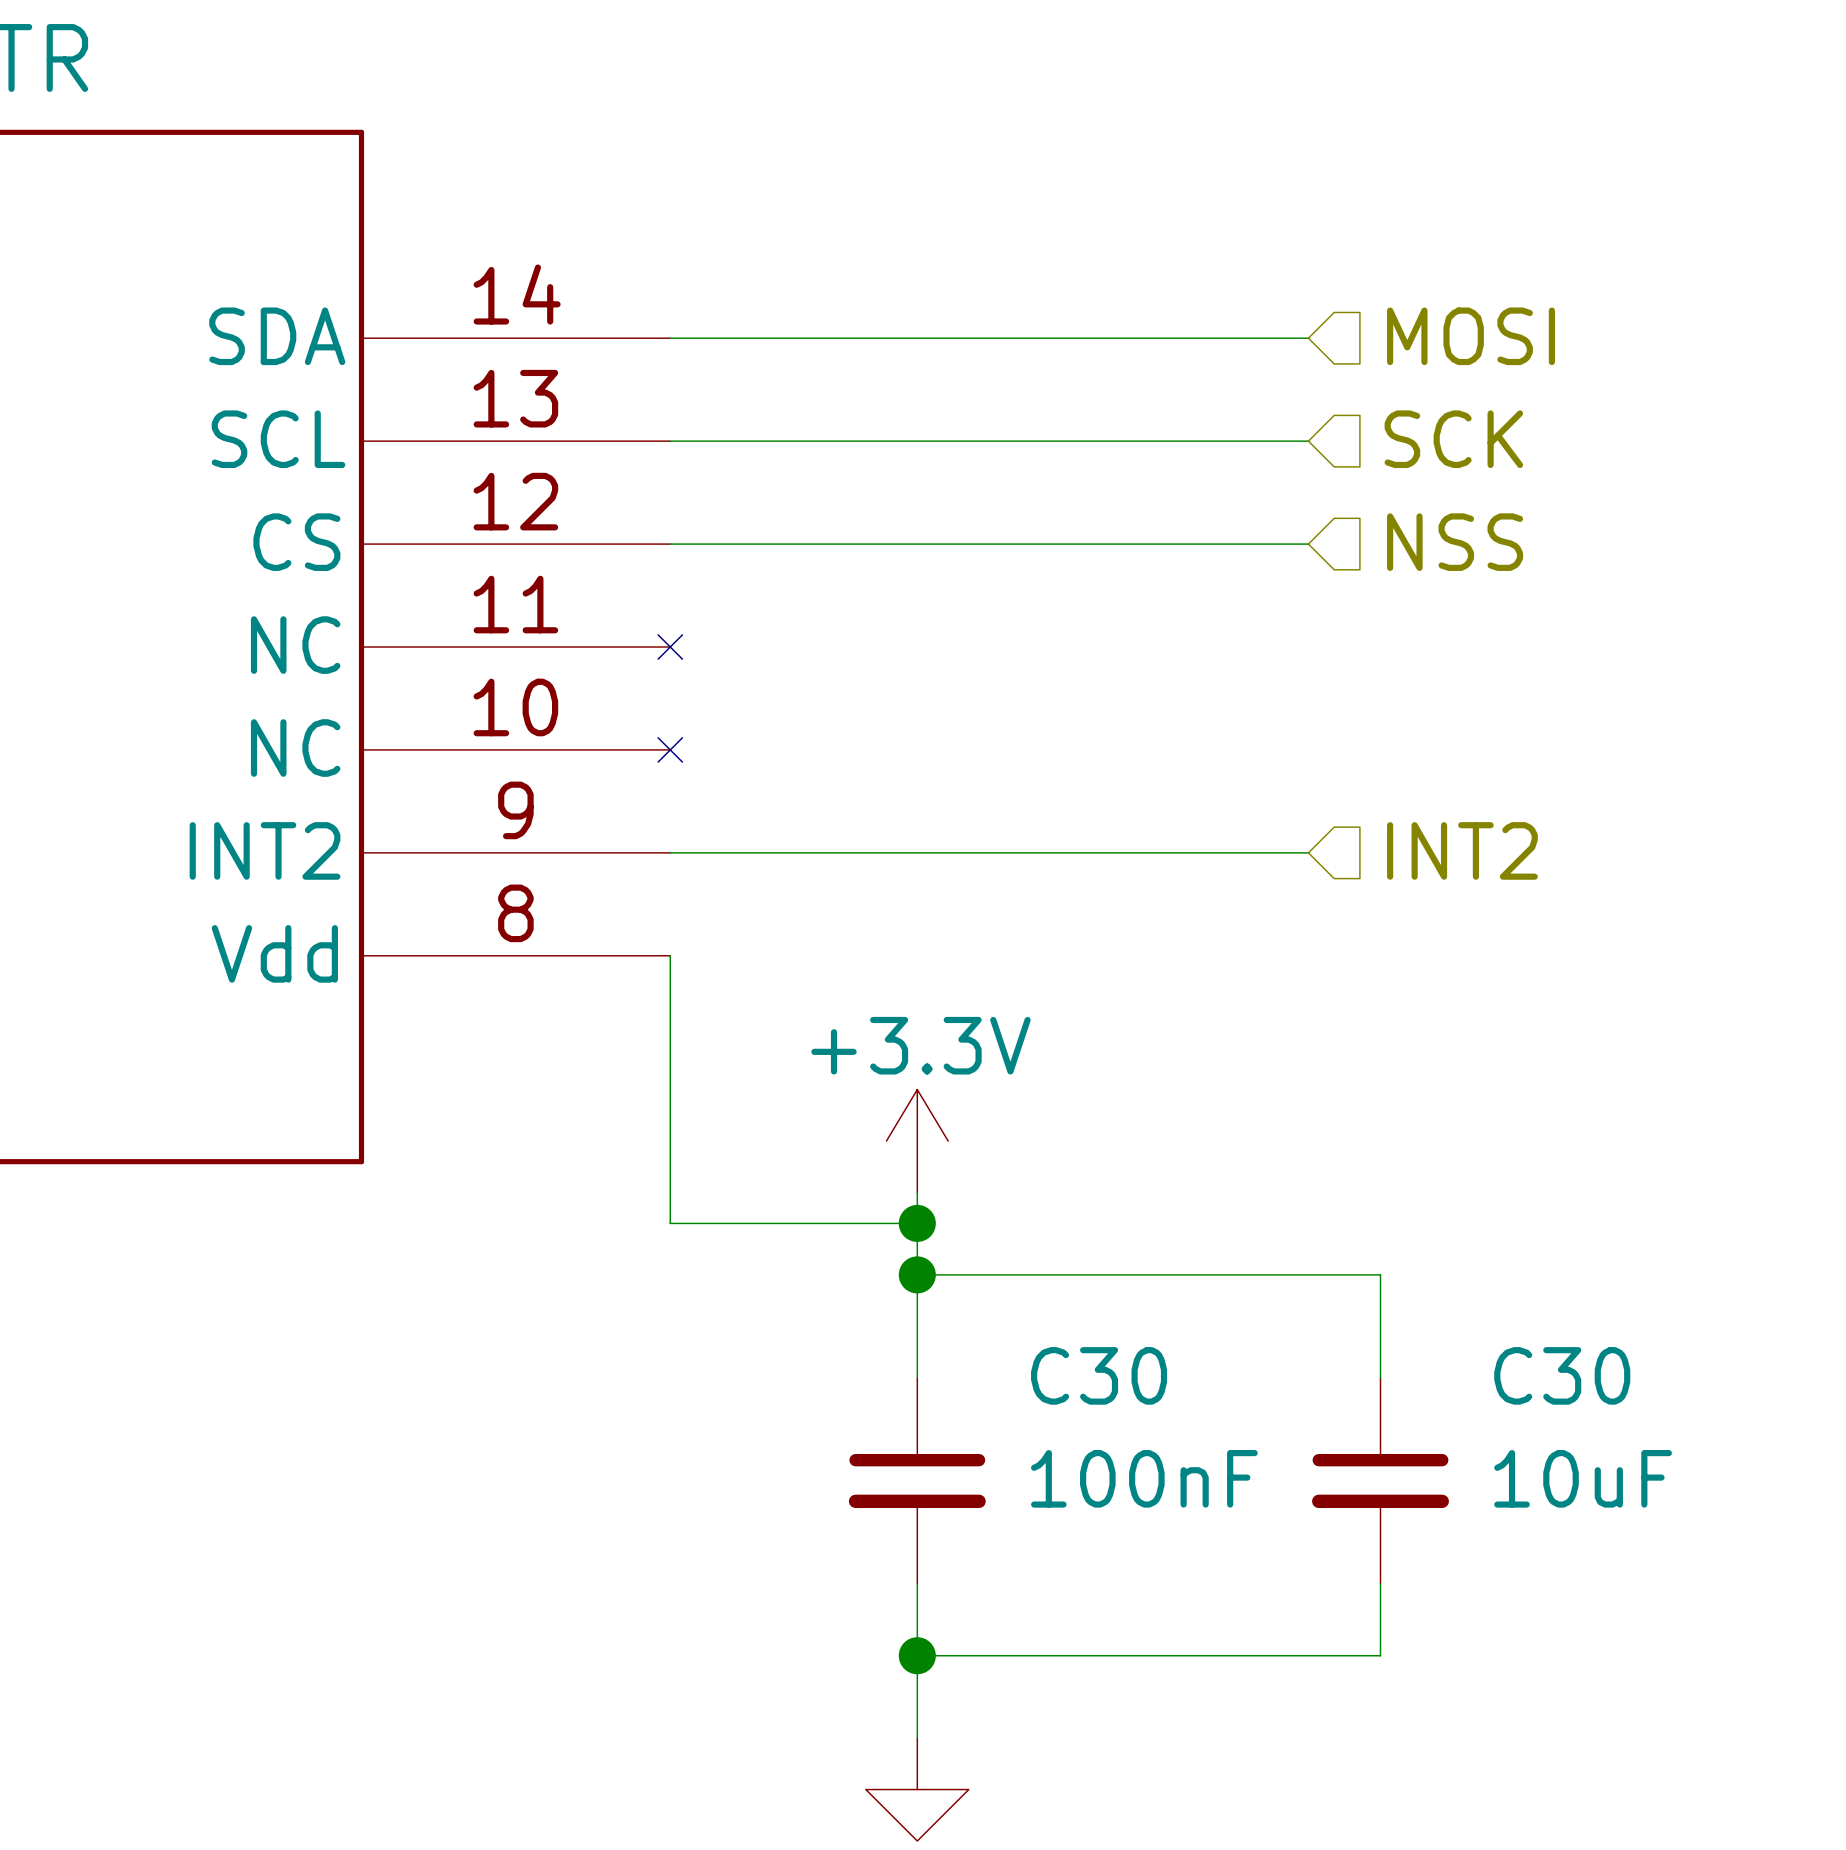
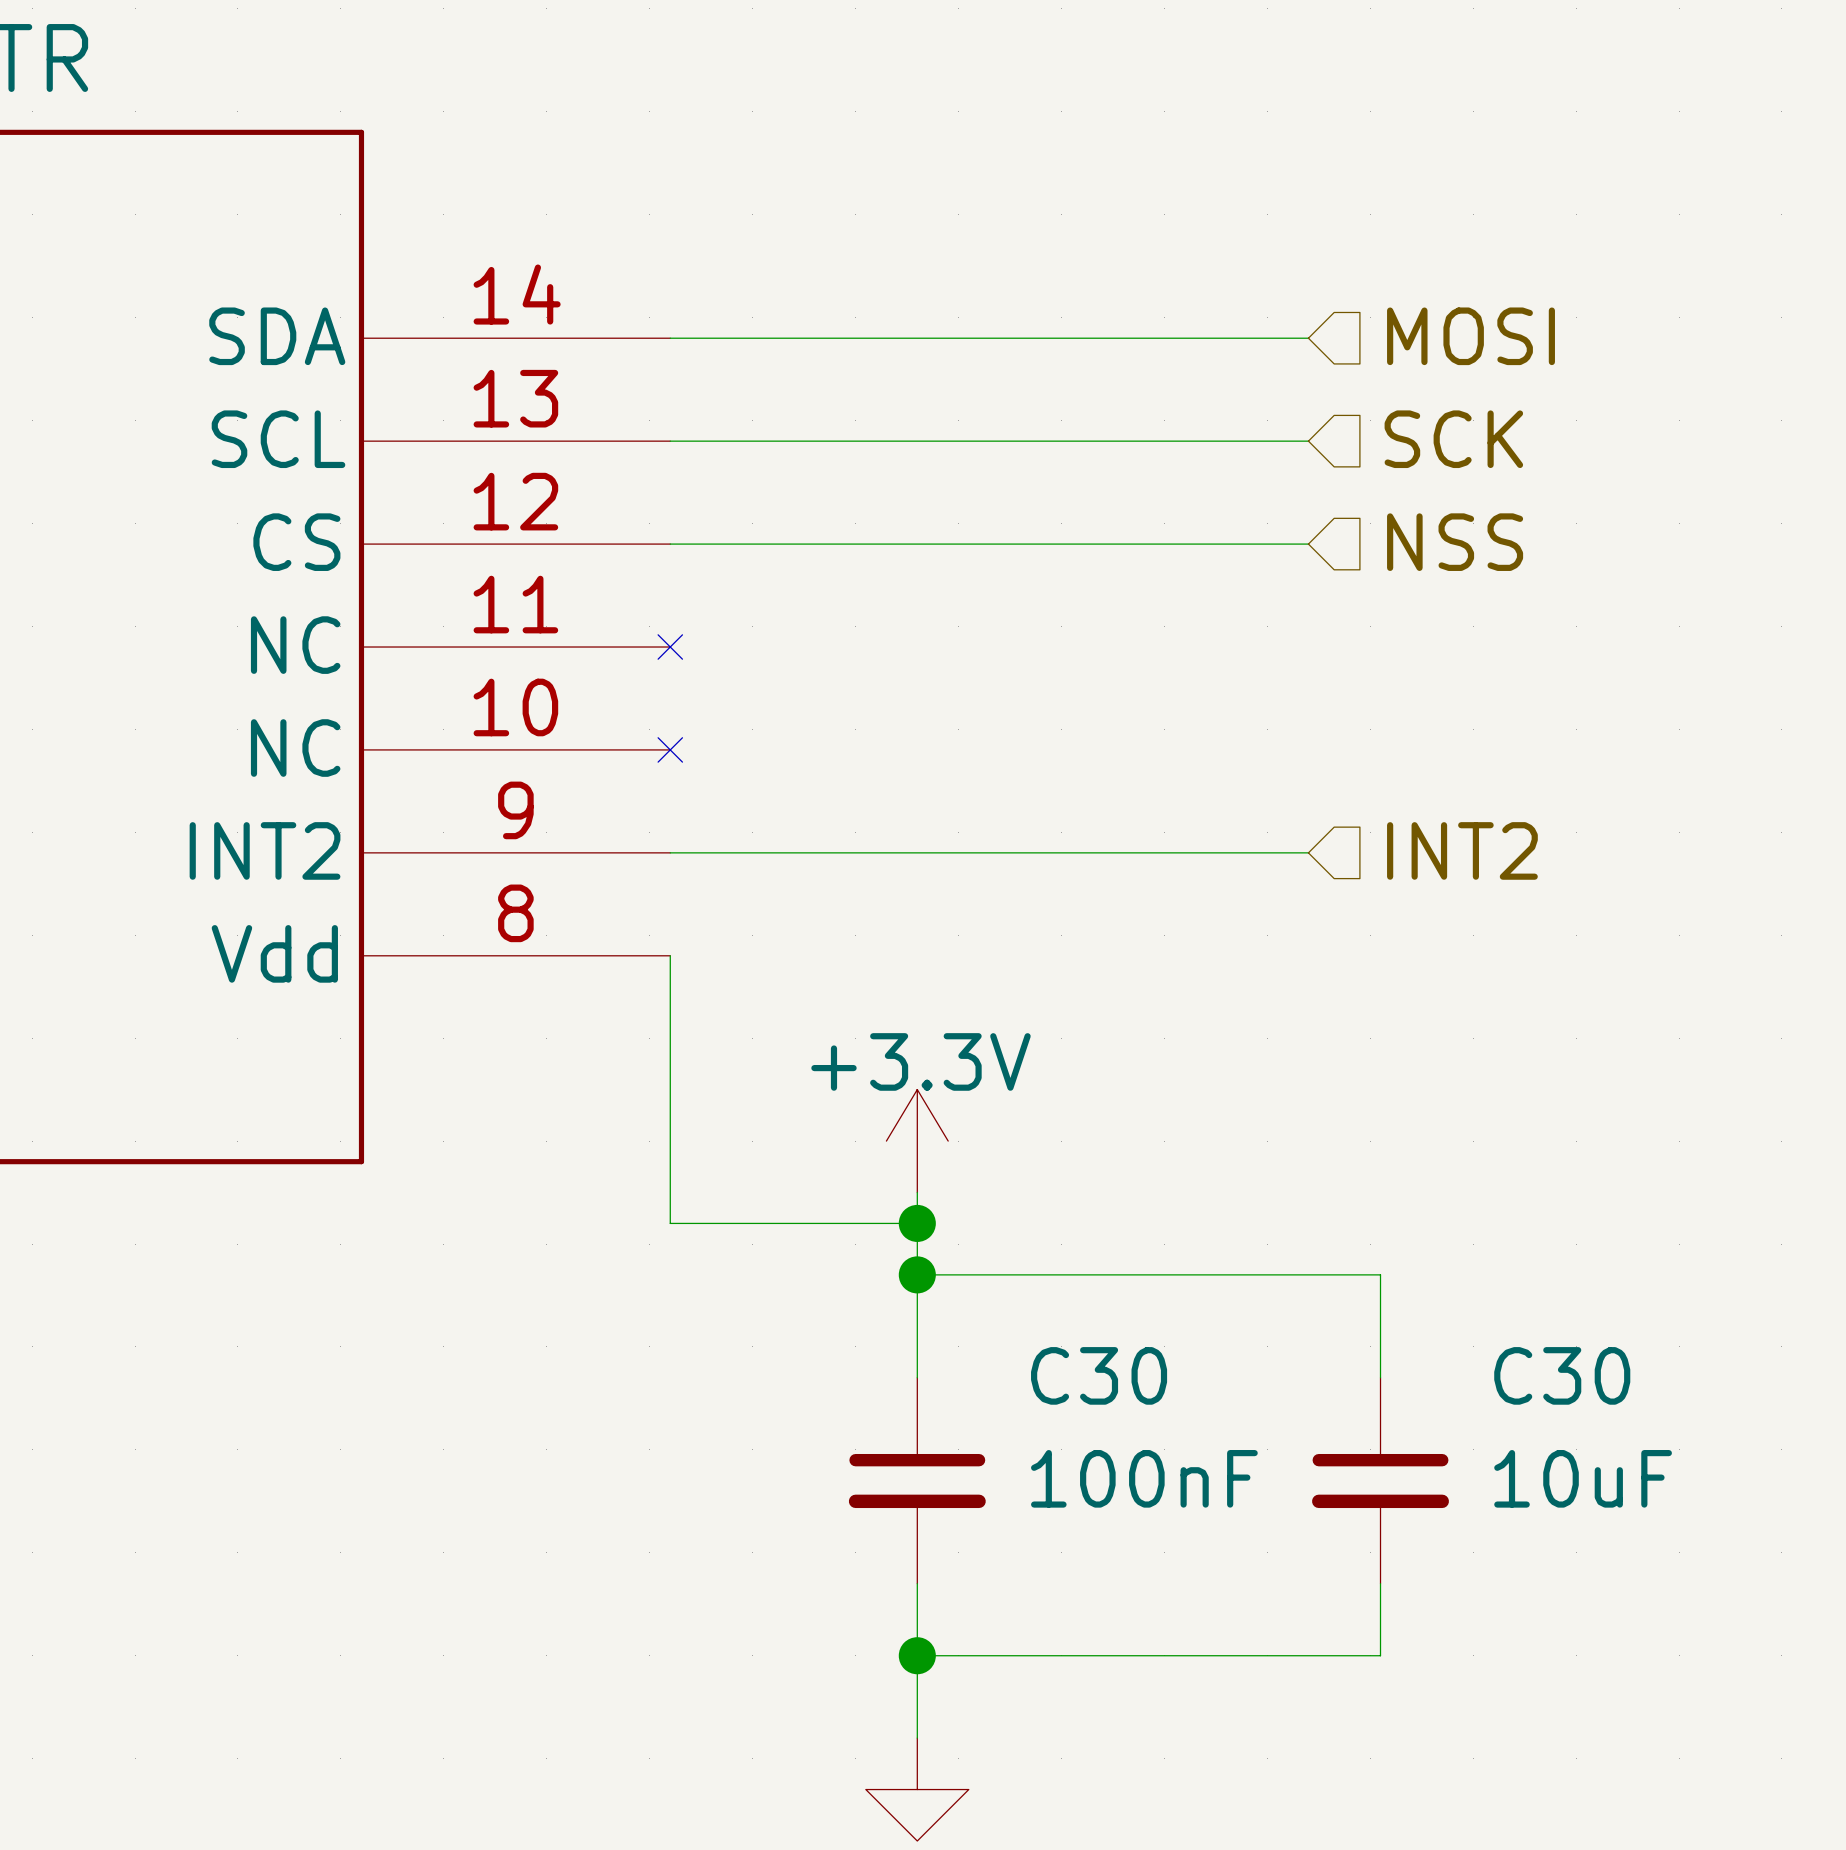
power symbol text position: +3.3V (920, 1045) -> +3.3V (920, 1061)

